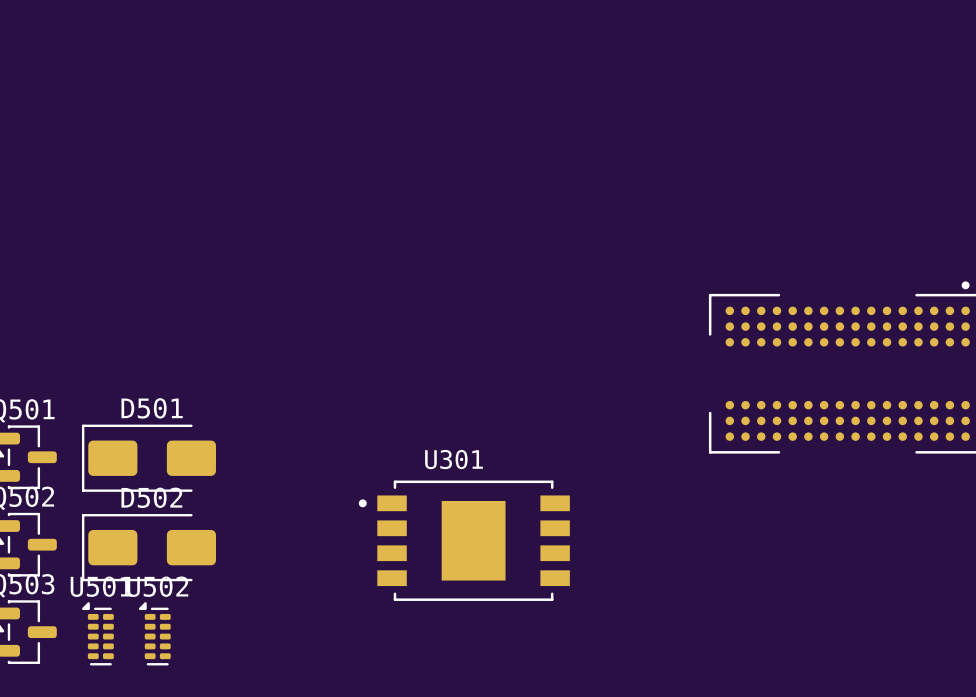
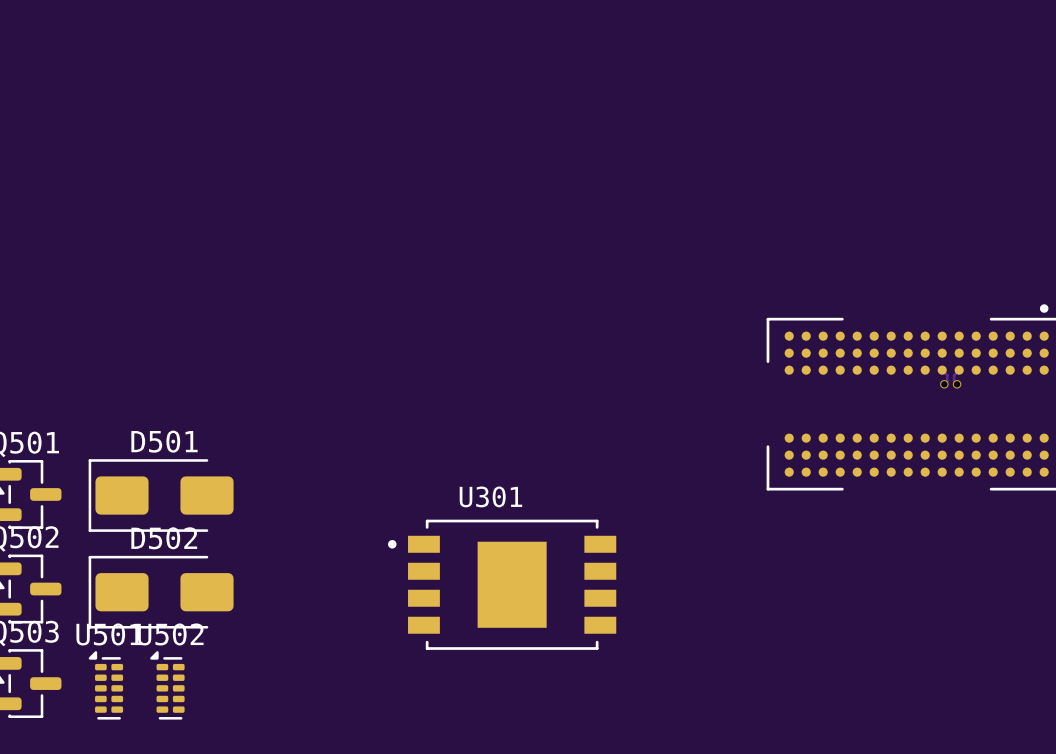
track: none -> (942, 370) (947, 375) (947, 381) (944, 384)
track: none -> (959, 370) (954, 375) (954, 381) (957, 384)
via: none -> (944, 384)
via: none -> (957, 384)

